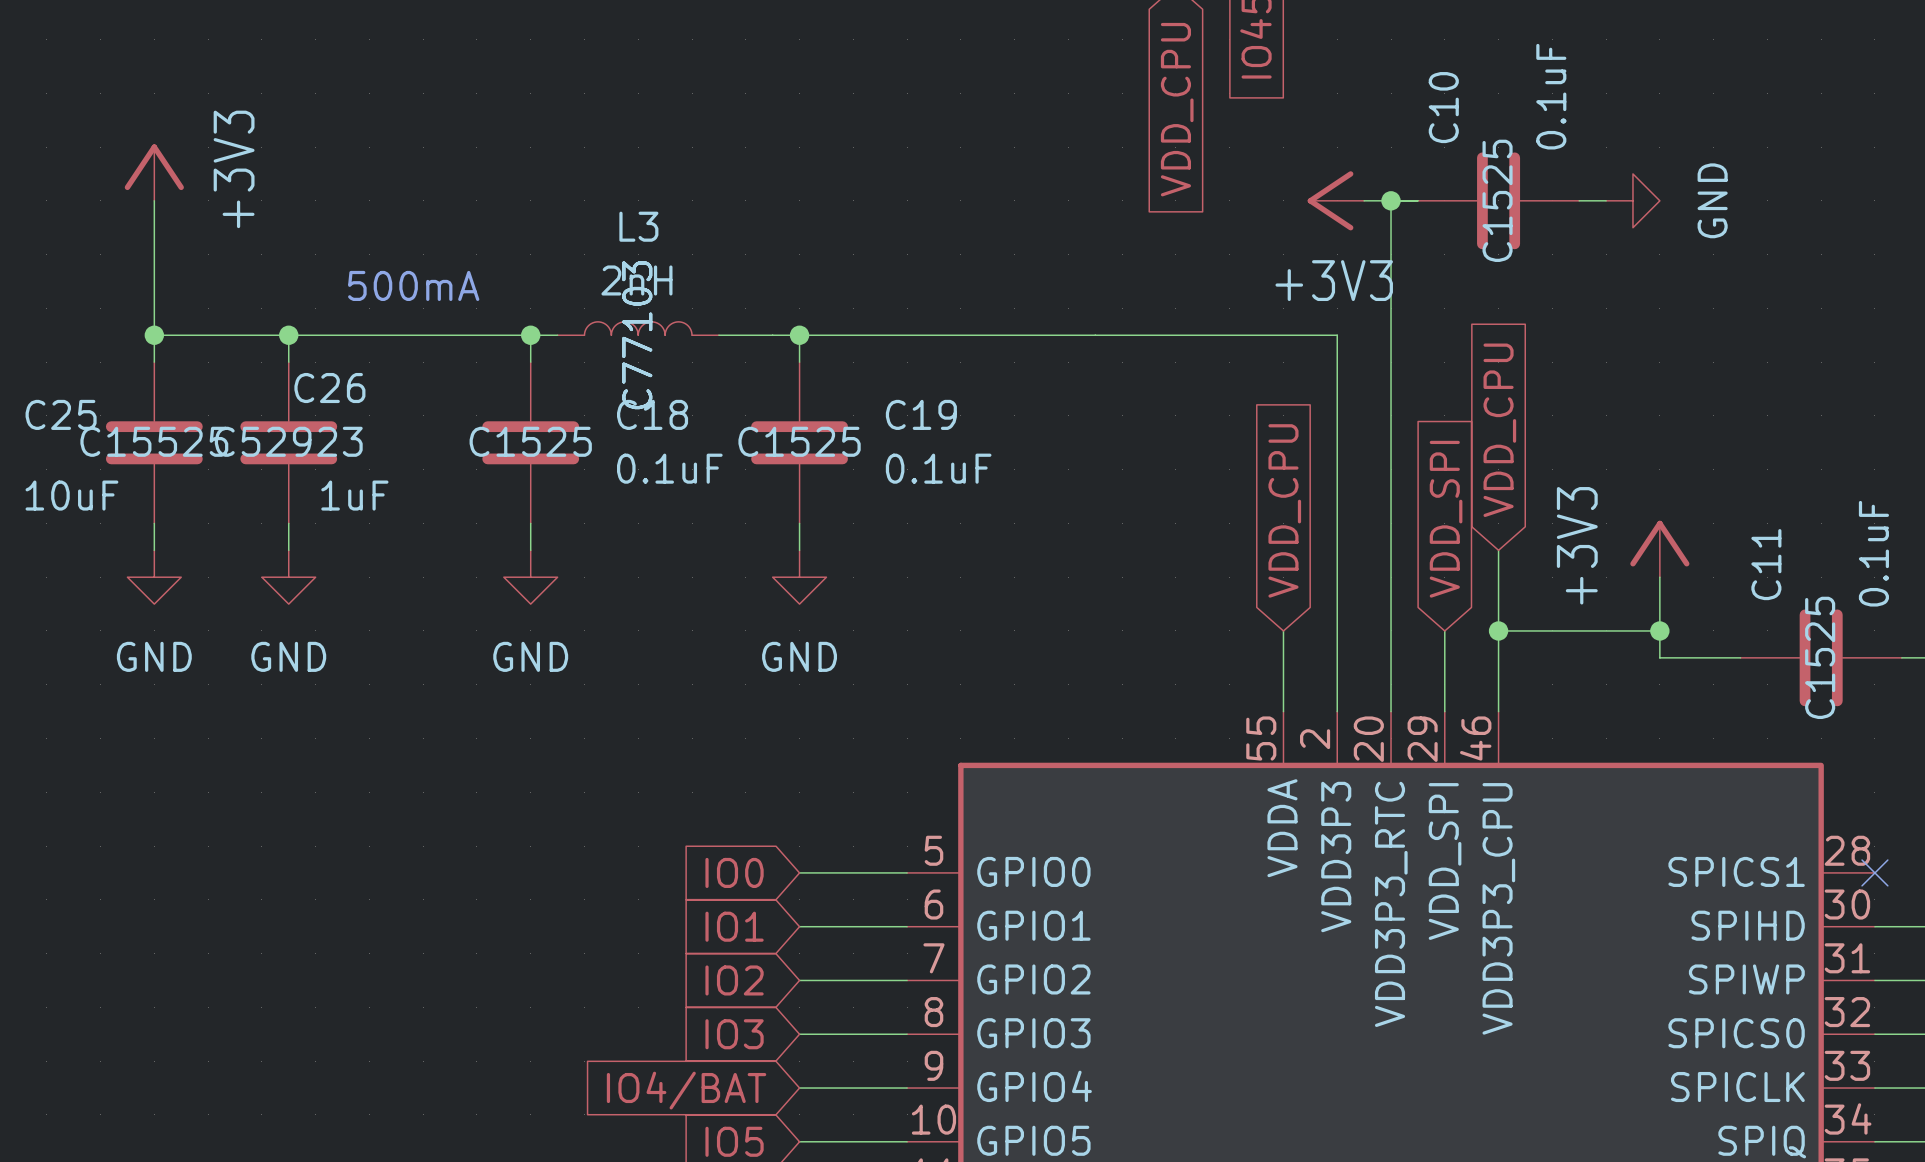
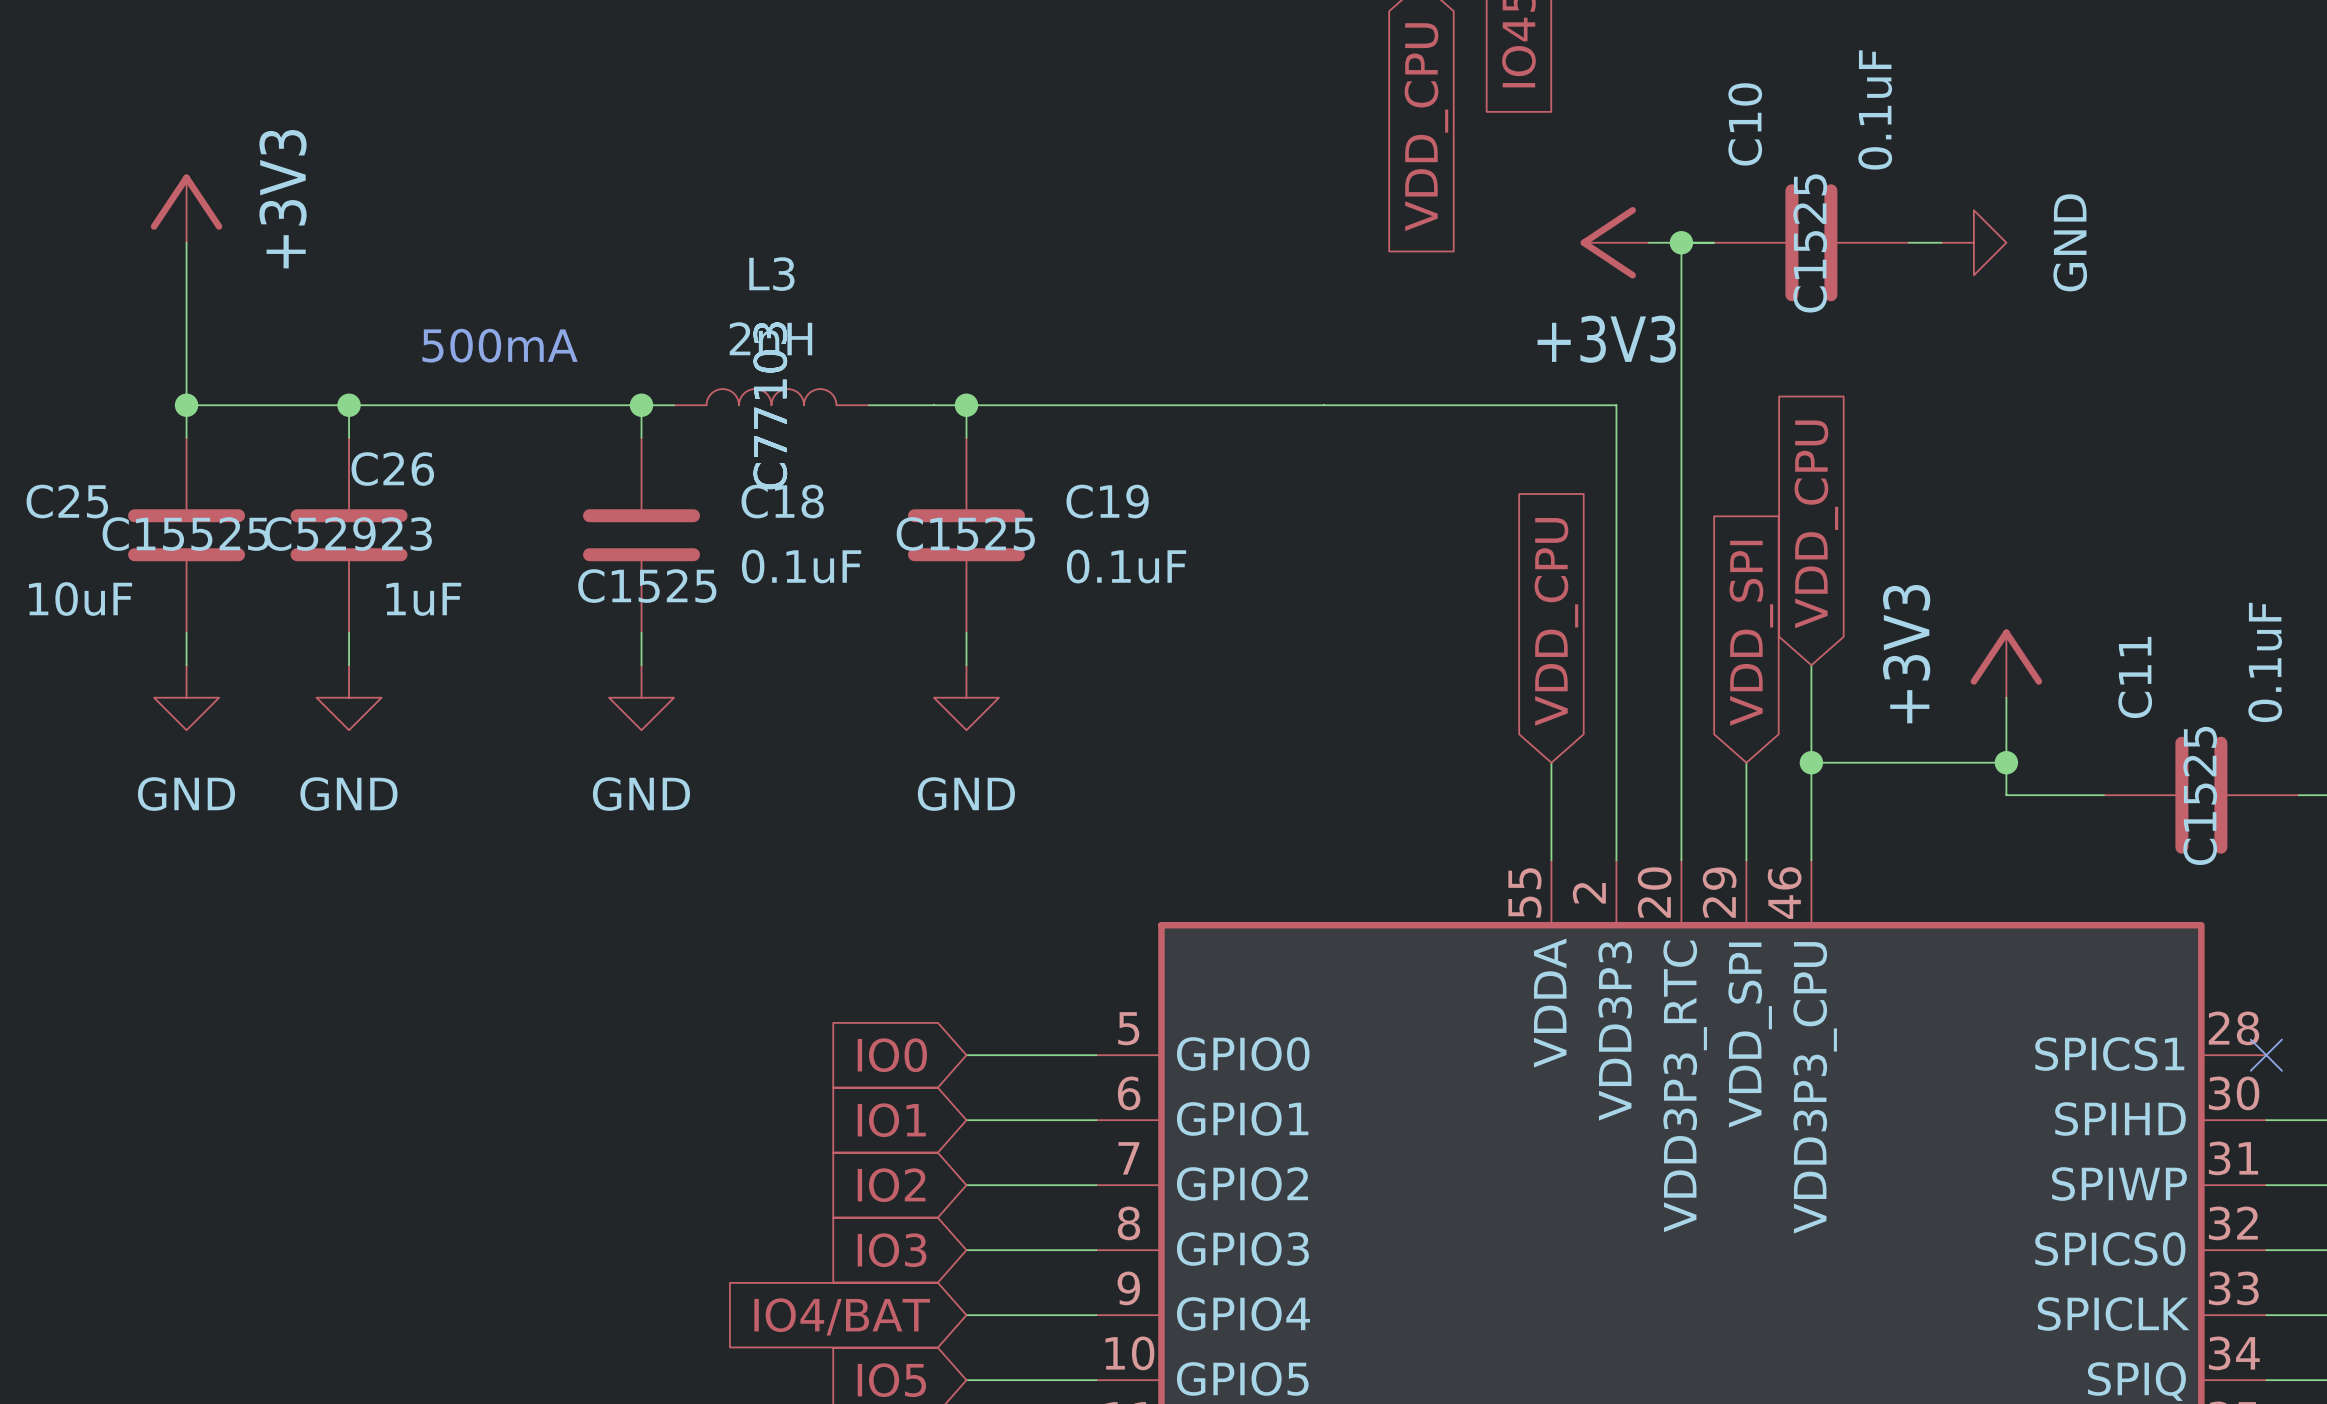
C18 text position: C1525 (530, 441) -> C1525 (647, 586)

